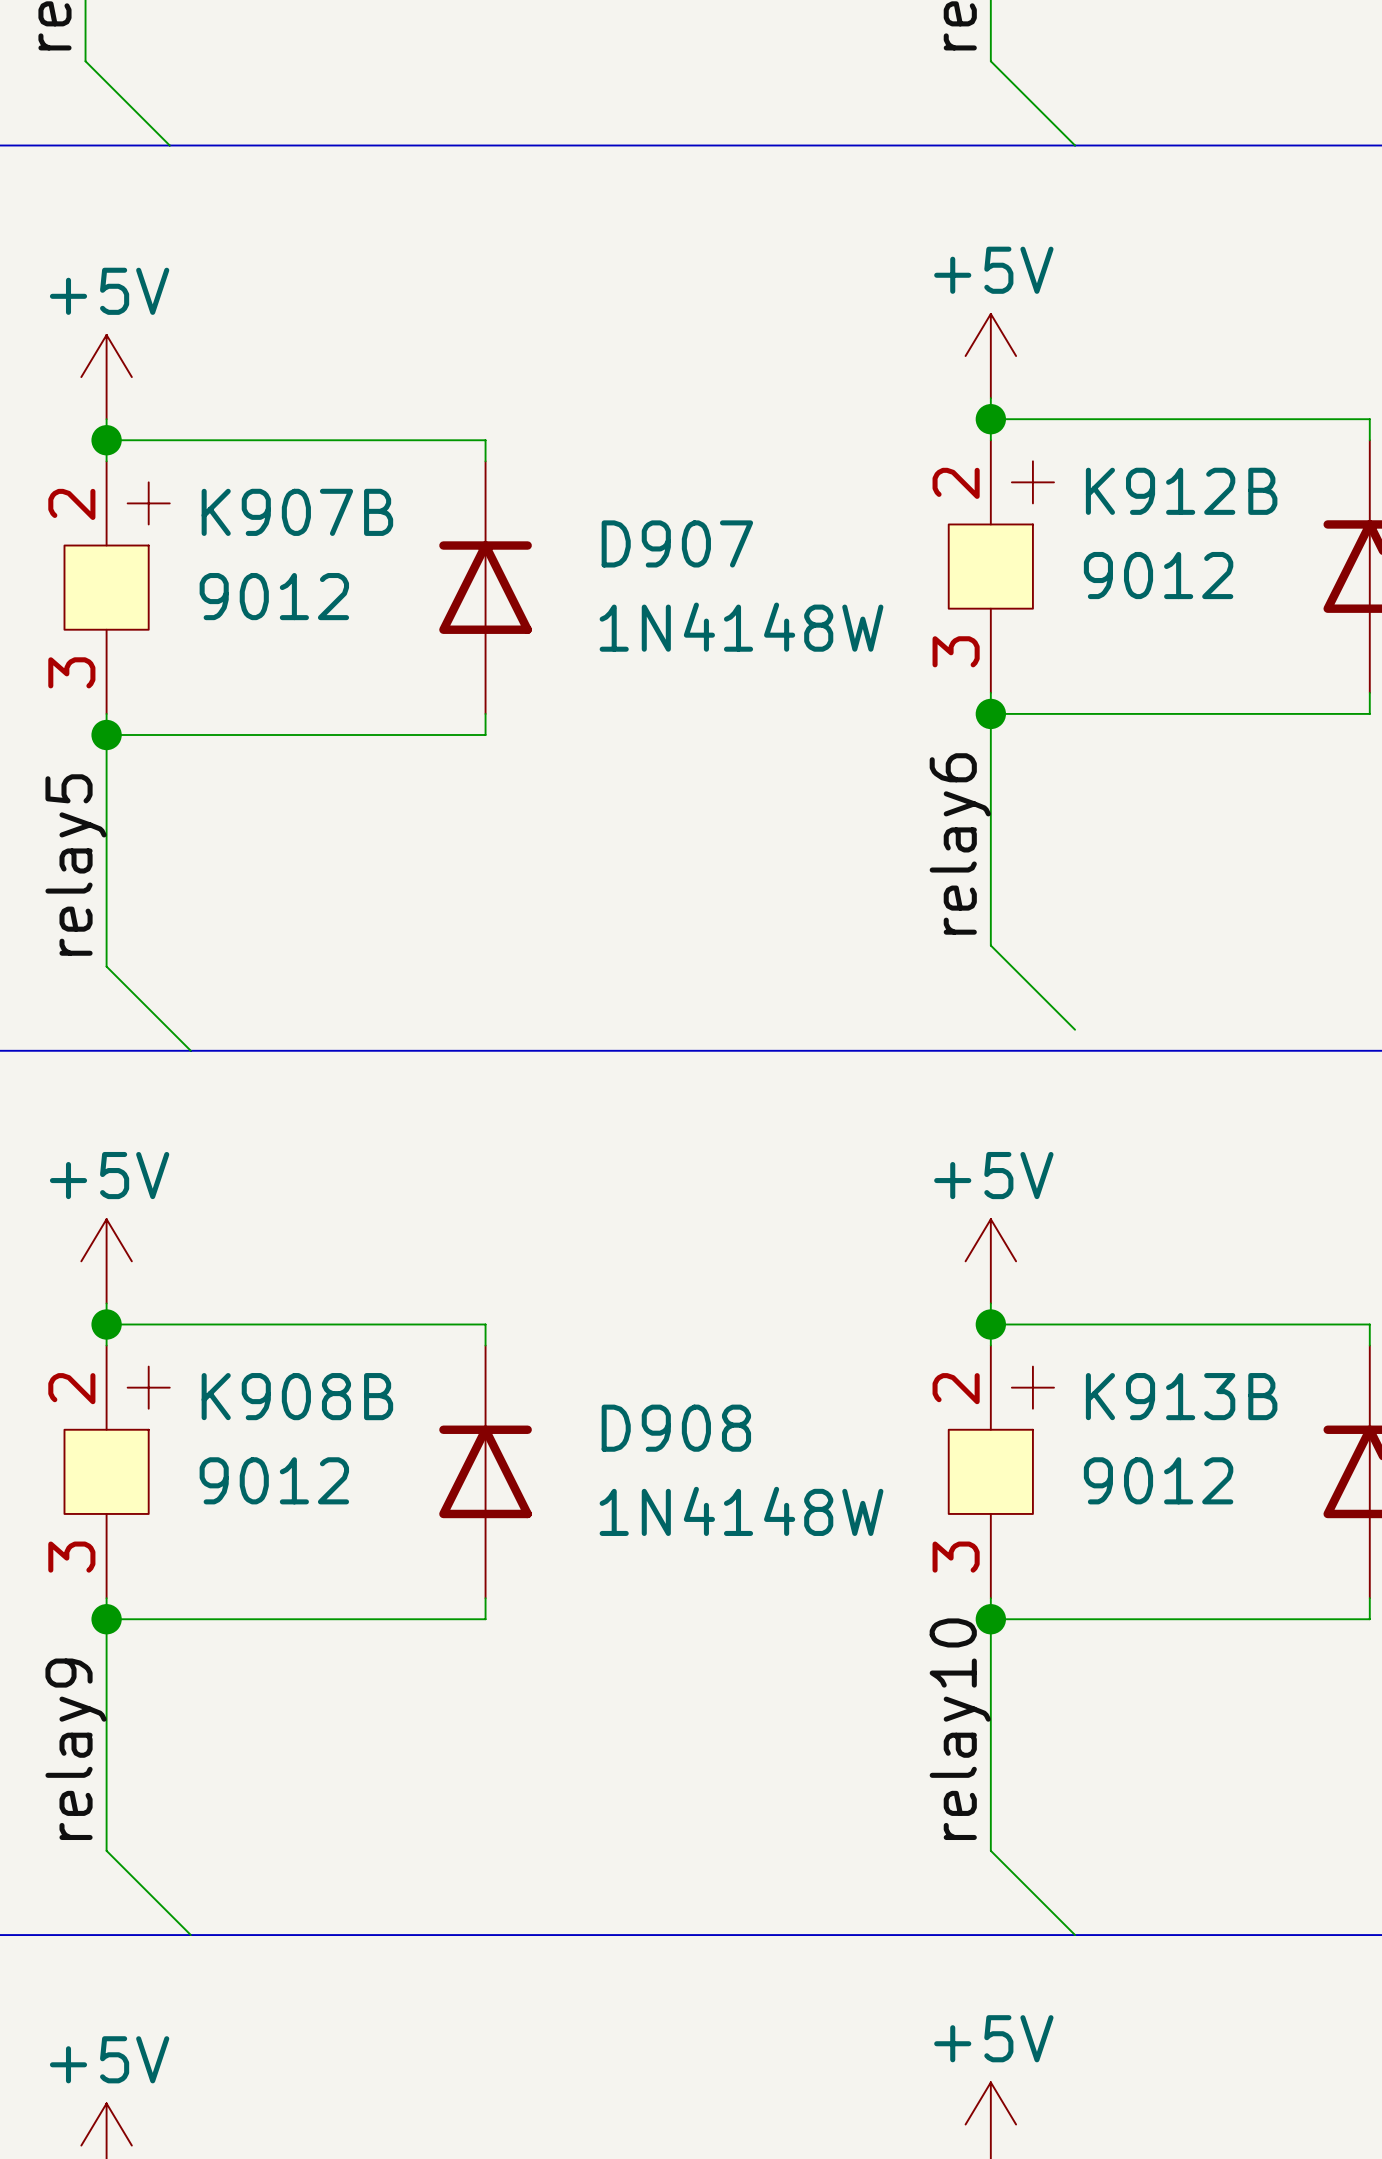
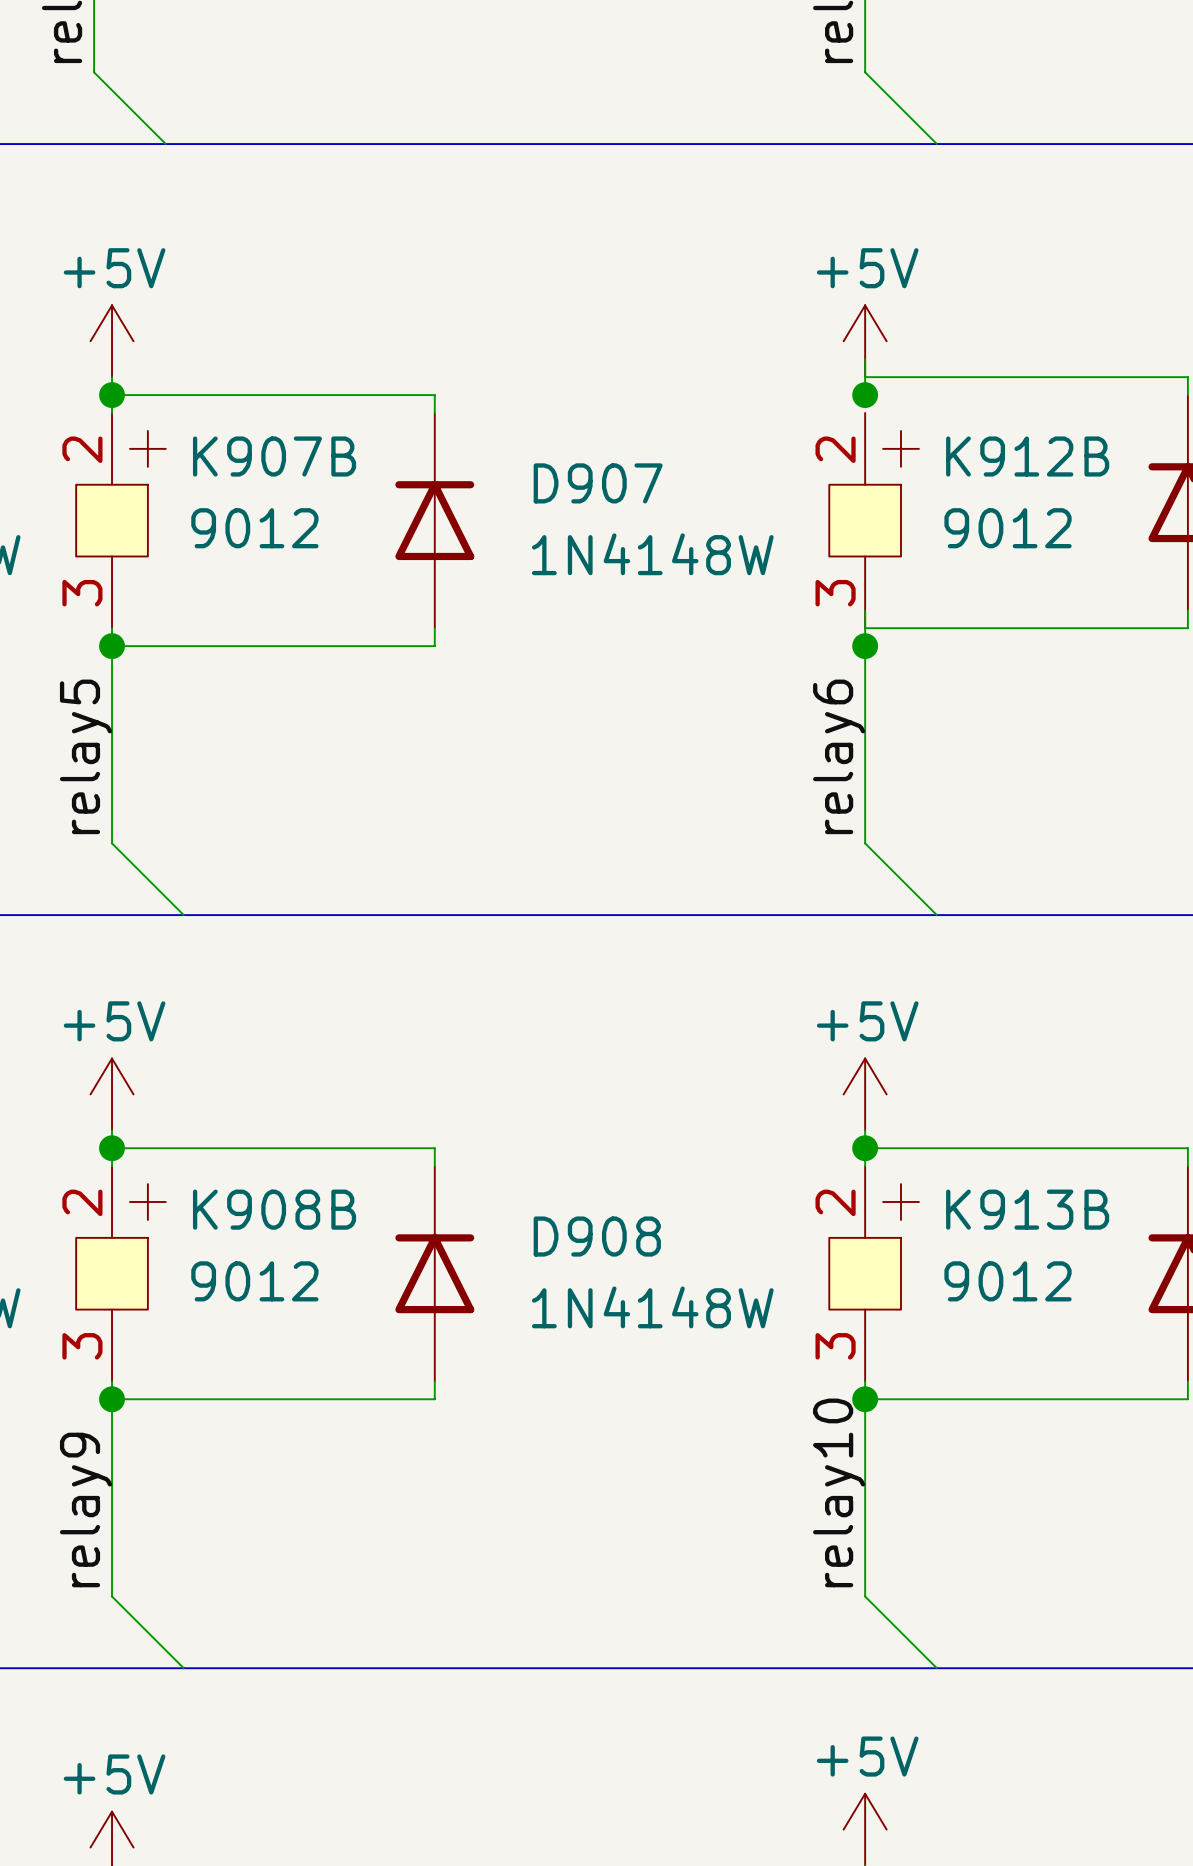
power symbol position: +5V (990, 356) -> +5V (865, 341)
junction position: (990, 419) -> (865, 395)
K912B position: (1001, 566) -> (874, 520)
junction position: (990, 713) -> (865, 646)
label position: relay6 (960, 843) -> relay6 (839, 756)
wire: (990, 945) (1075, 1029) -> (865, 825) (865, 843) (936, 915)

